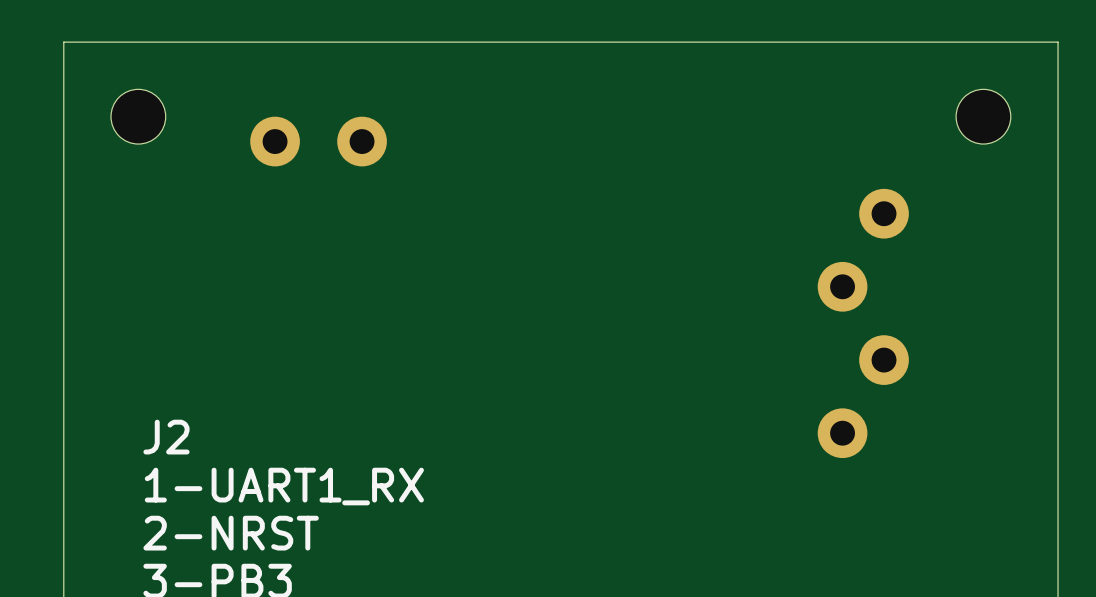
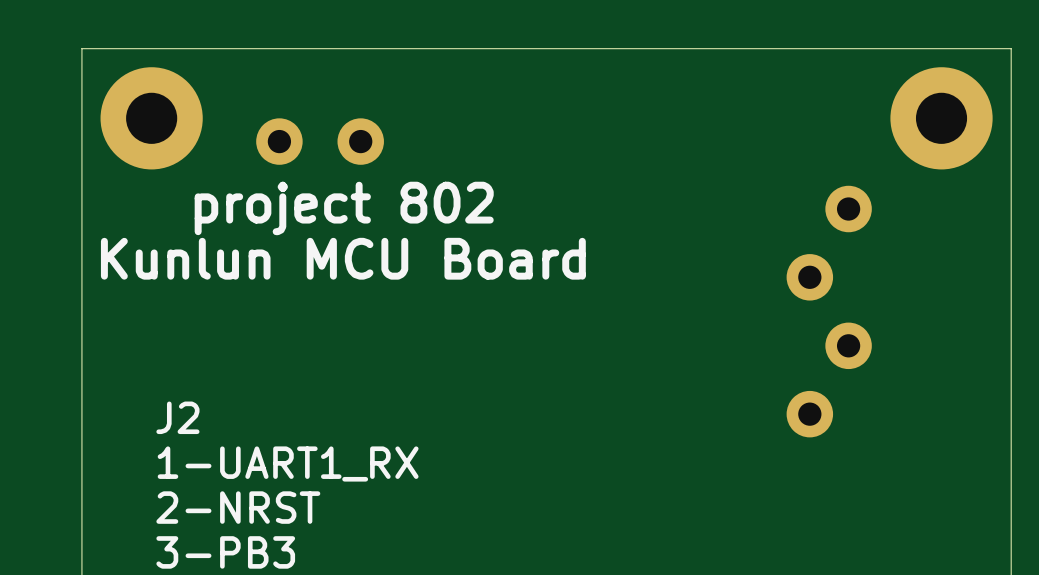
part footprint: [111, 89, 166, 145] -> [100, 67, 203, 170]
part footprint: [956, 89, 1011, 145] -> [890, 67, 993, 170]
text: none -> project 802 (344, 208)
text: none -> Kunlun MCU Board (343, 258)

